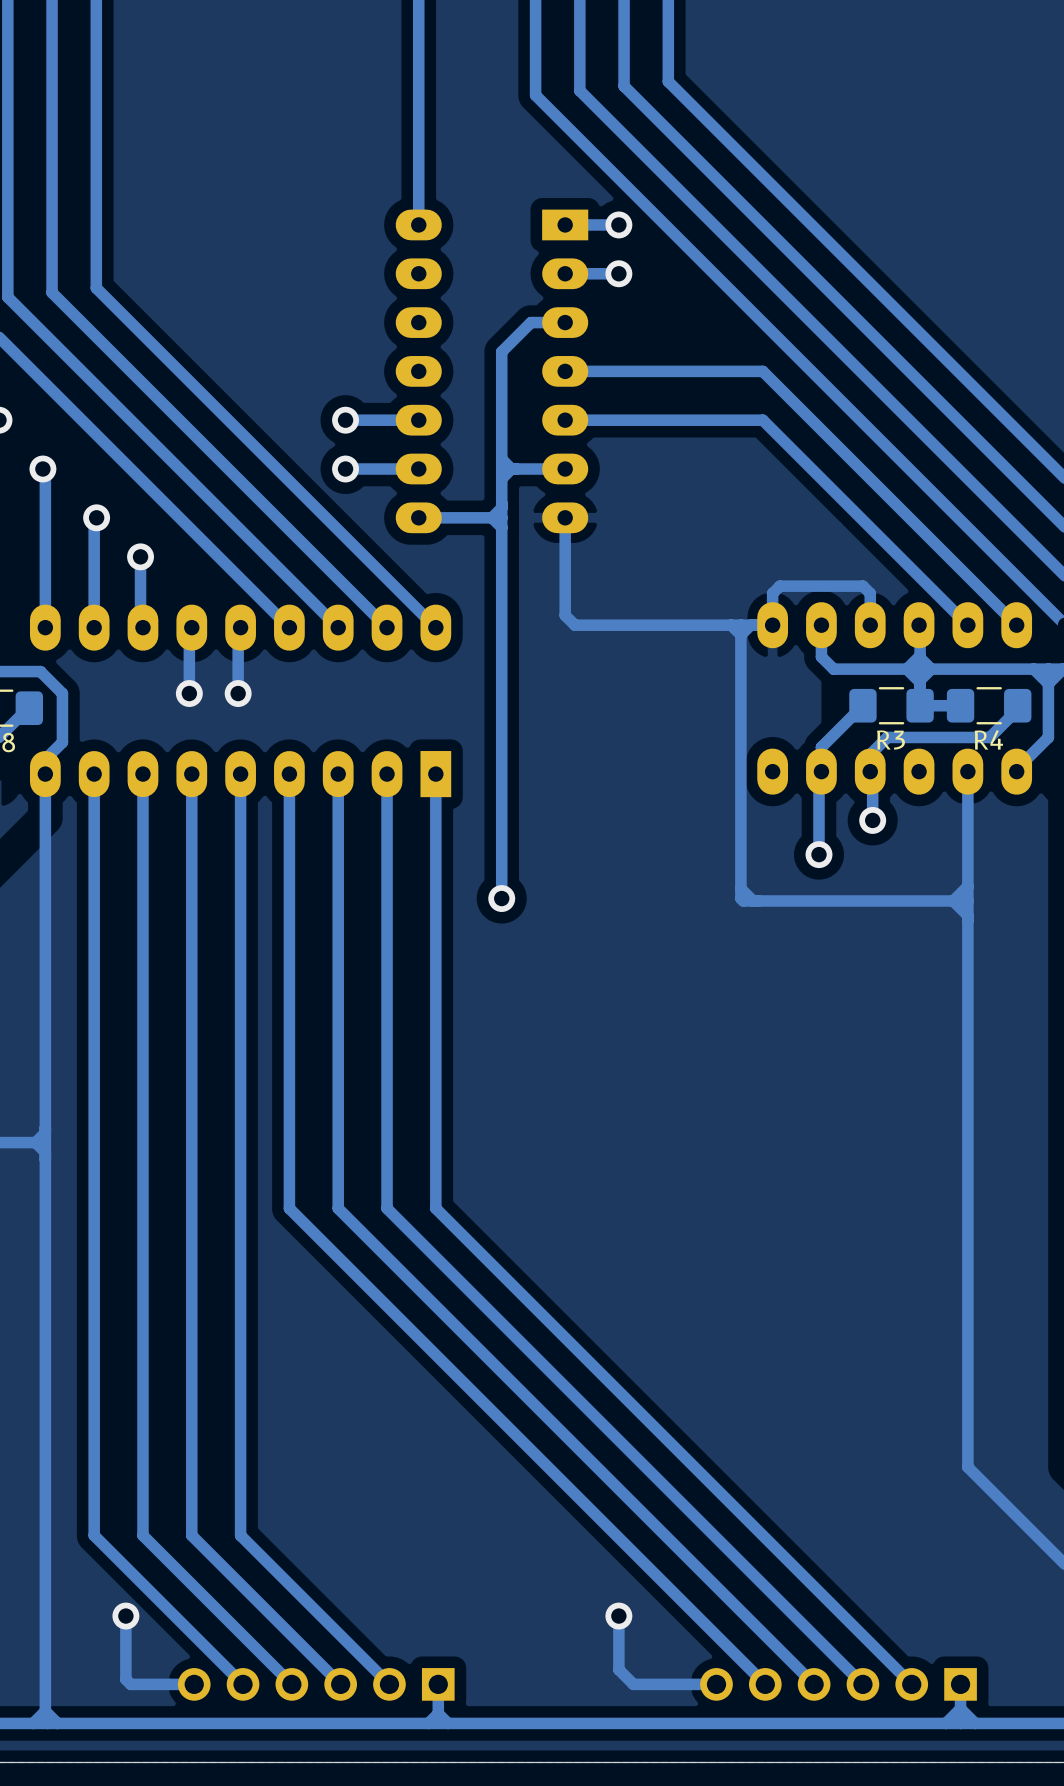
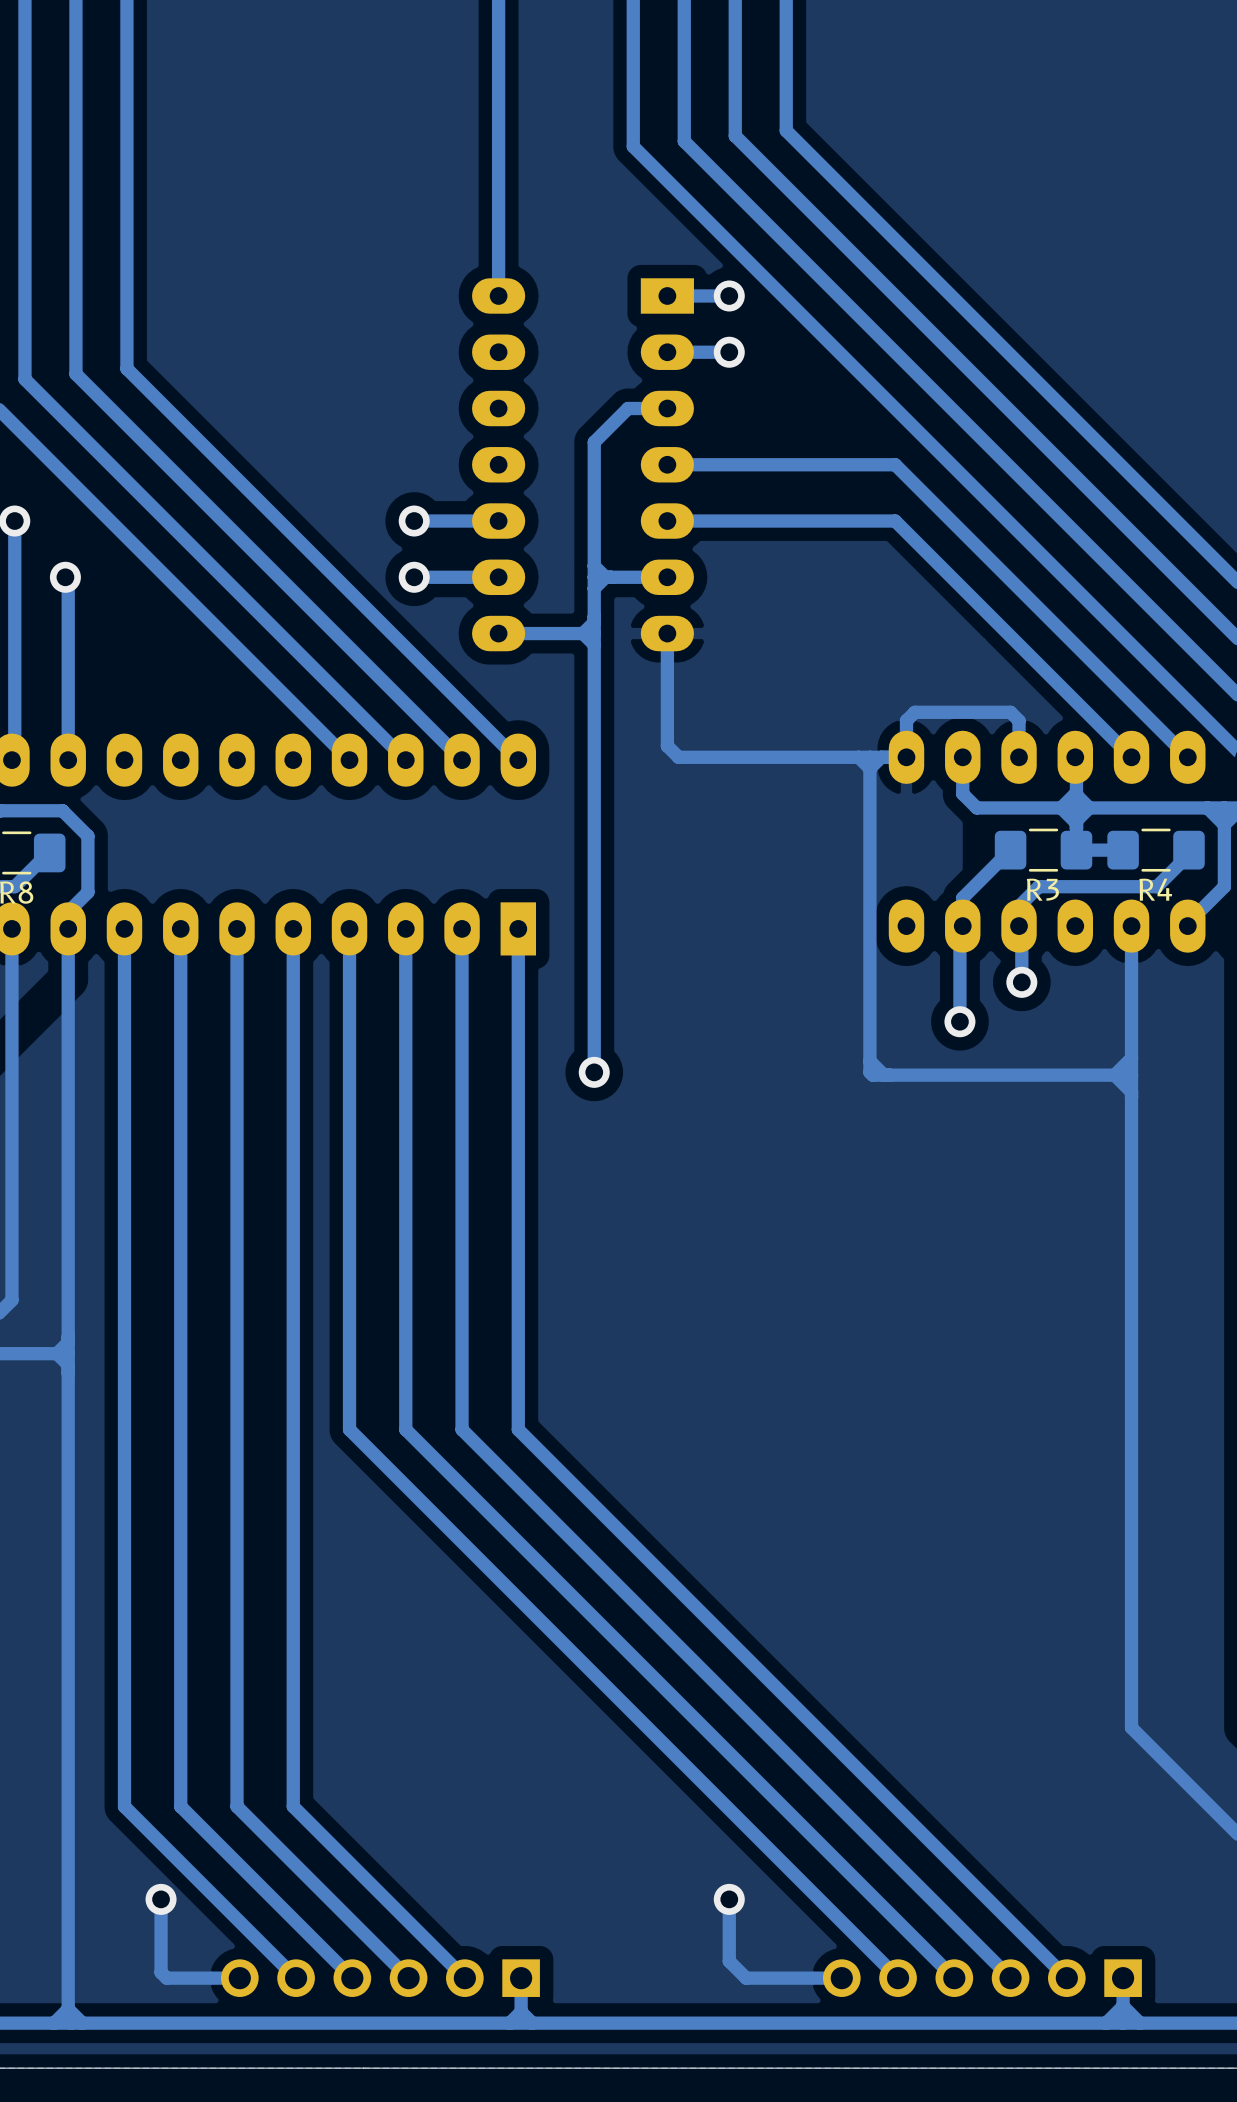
track: (96, 517) (94, 520) (94, 627) -> none
via: (96, 517) -> none
track: (140, 556) (140, 625) (142, 627) -> none
via: (140, 556) -> none
track: (191, 627) (189, 630) (189, 693) -> none
track: (240, 627) (238, 630) (238, 693) -> none
via: (189, 693) -> none
via: (238, 693) -> none

